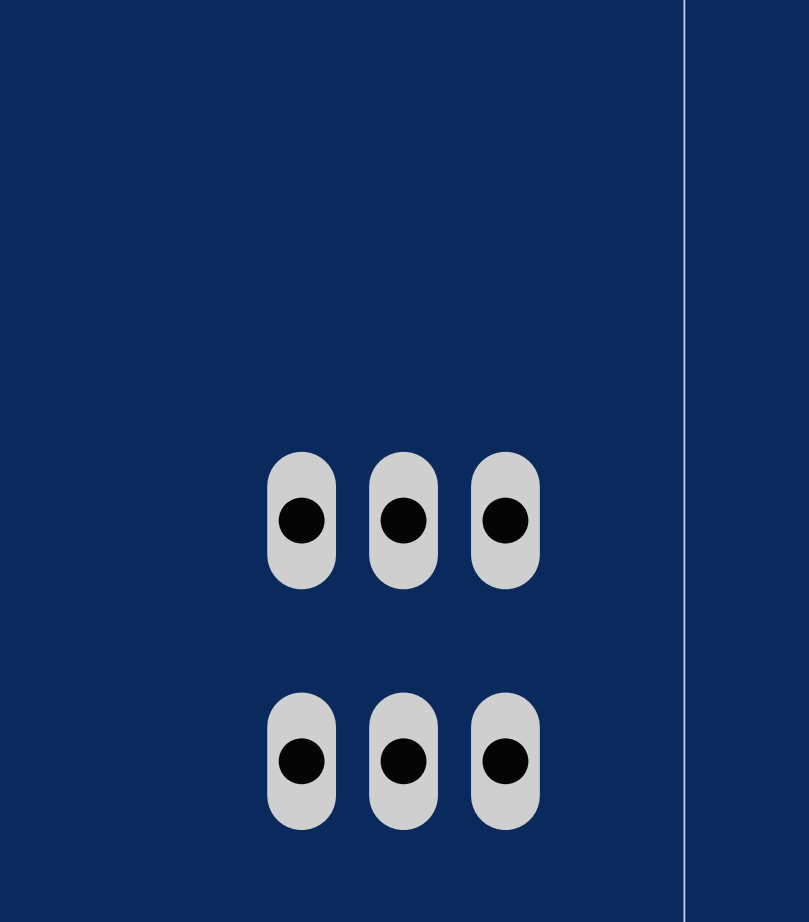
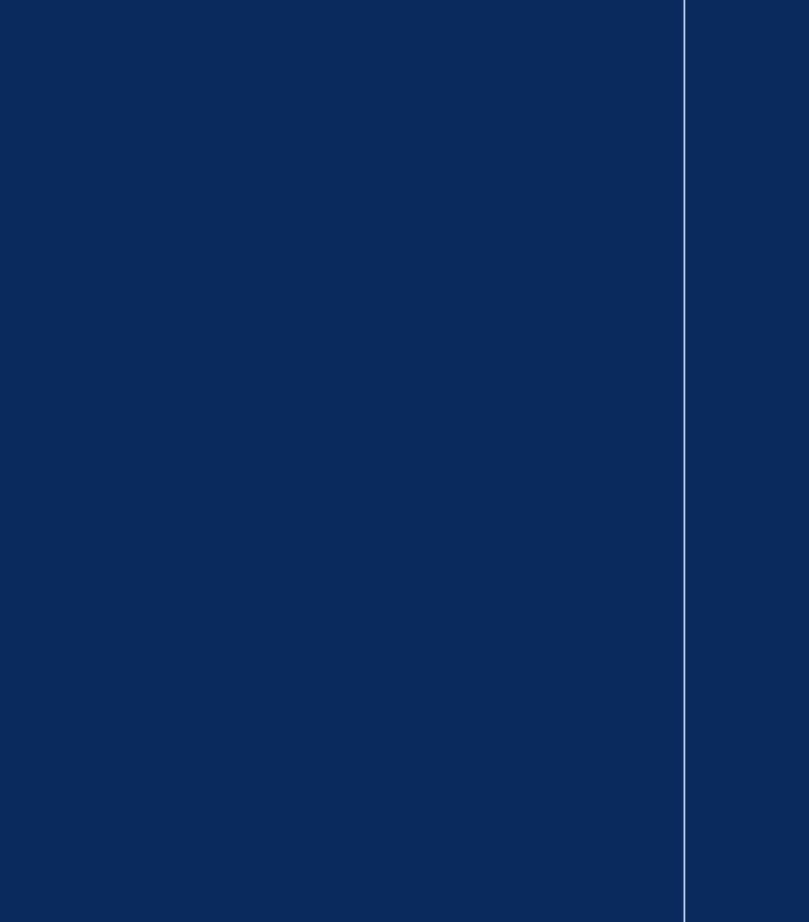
part: (403, 520) -> none
part: (403, 761) -> none

